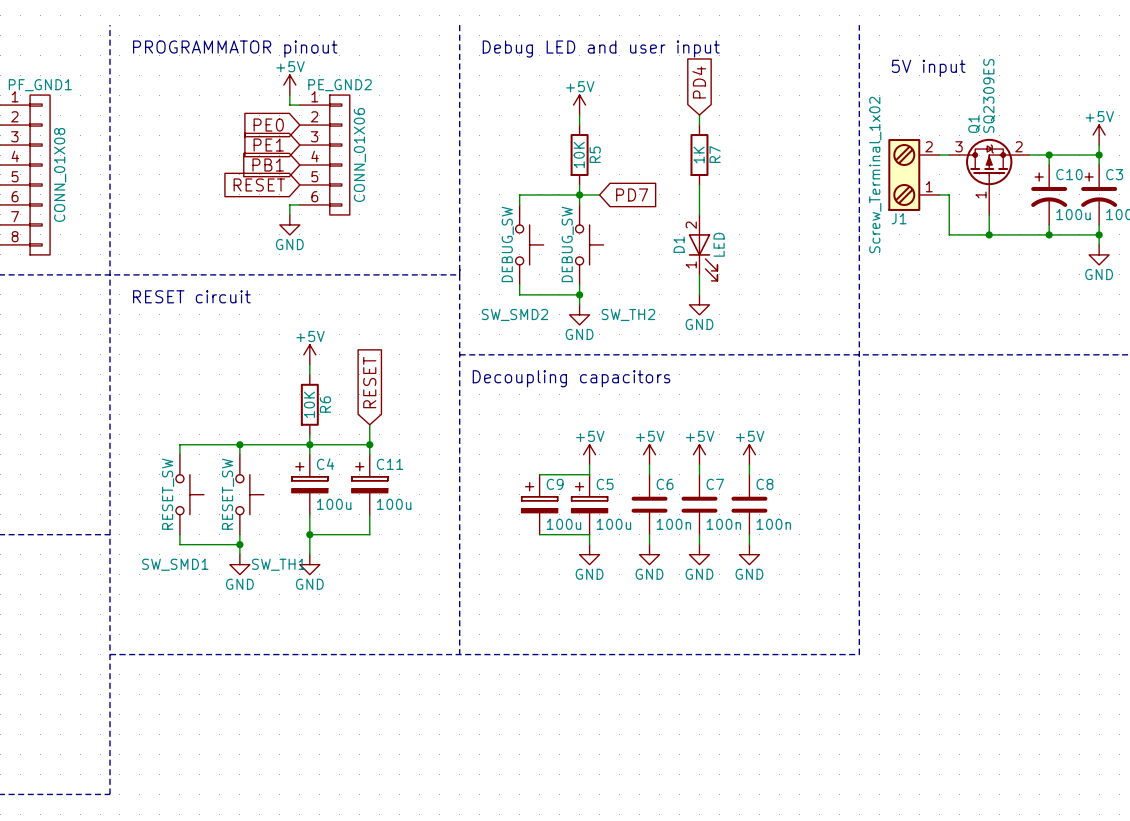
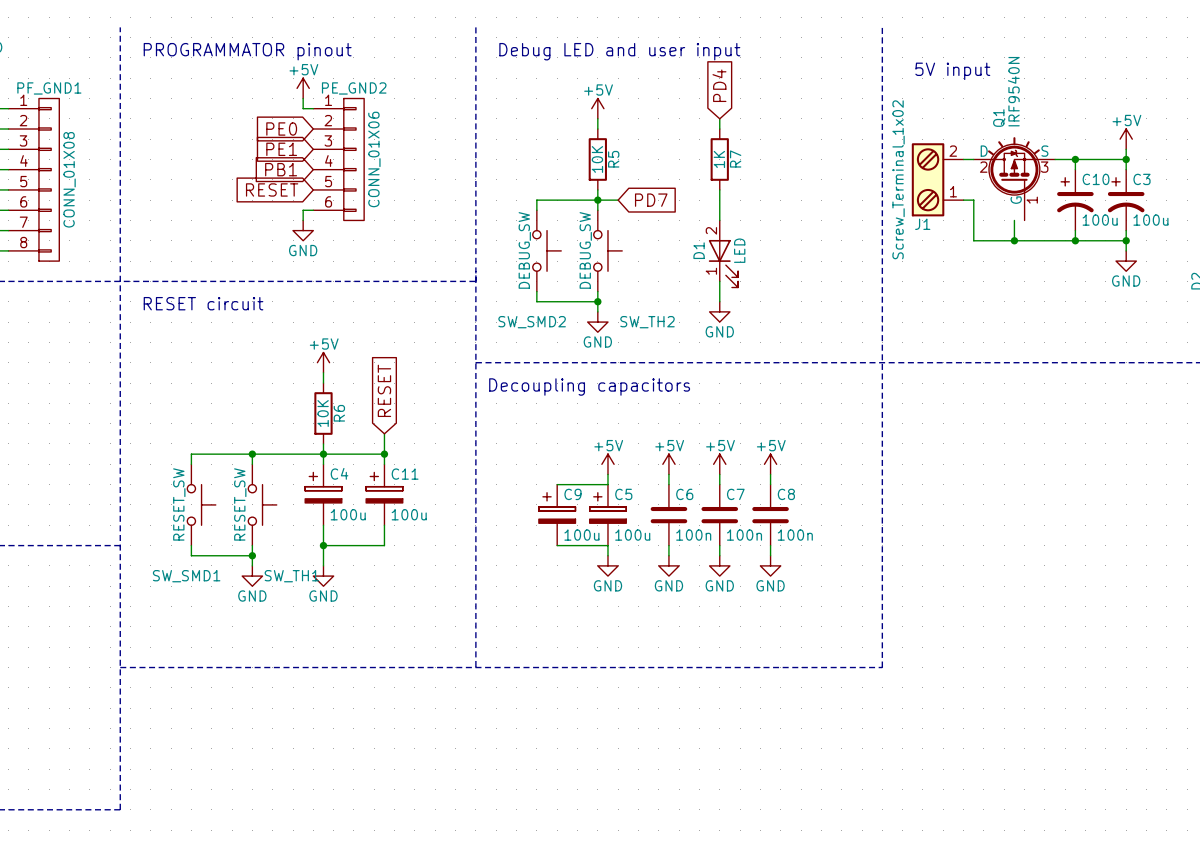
Q1 value: SQ2309ES (989, 95) -> IRF9540N (1013, 91)
Q1 symbol: [949, 138, 1030, 215] -> [973, 137, 1056, 221]

